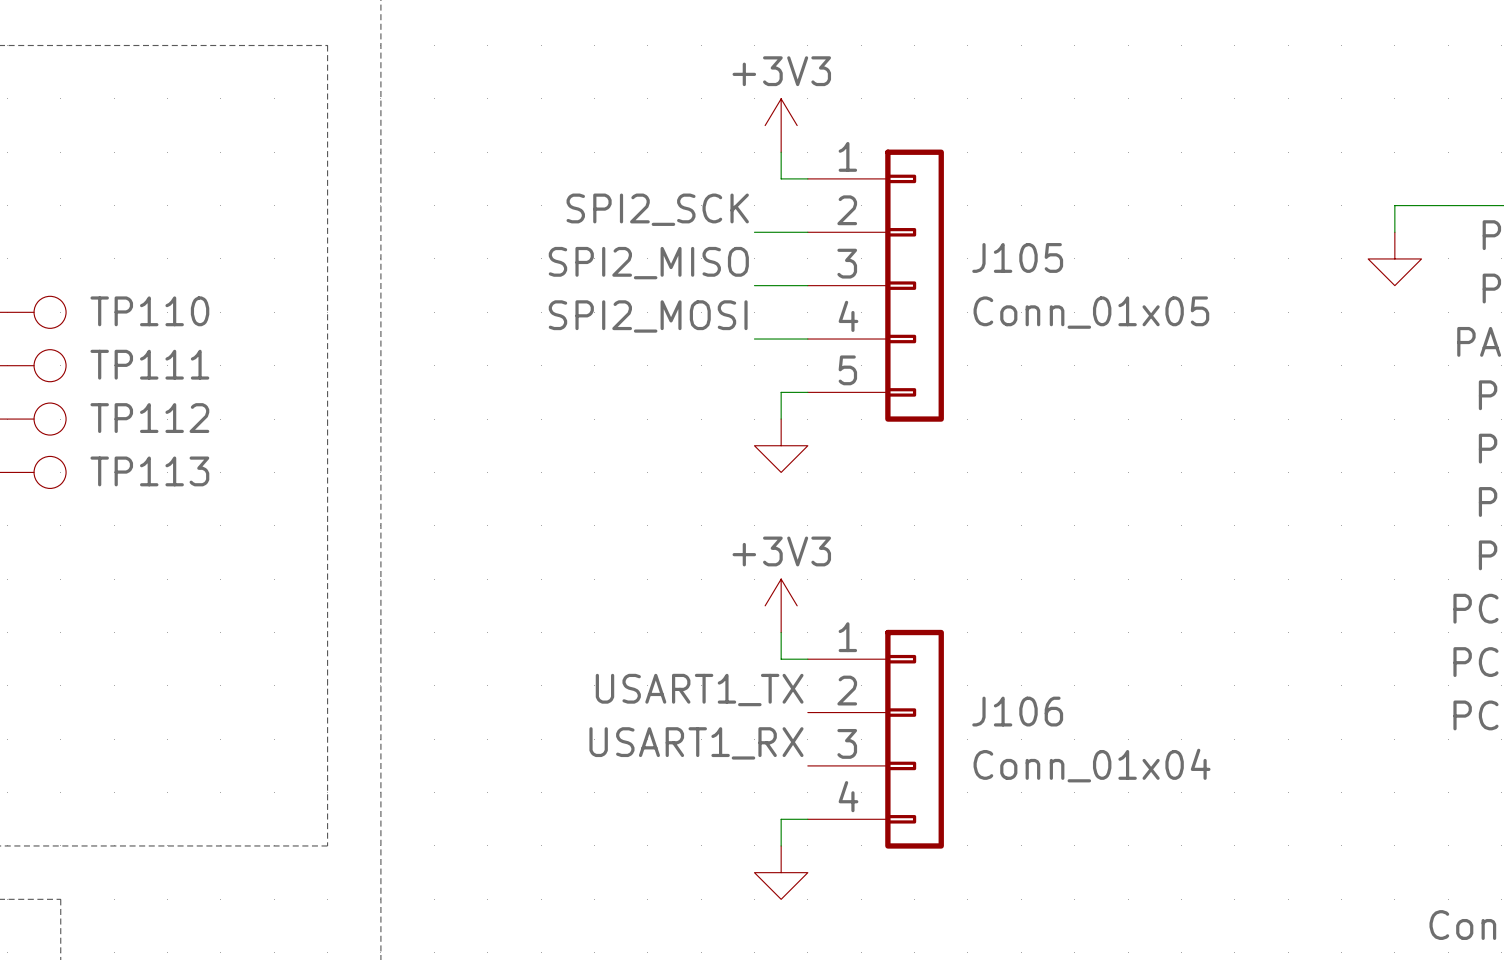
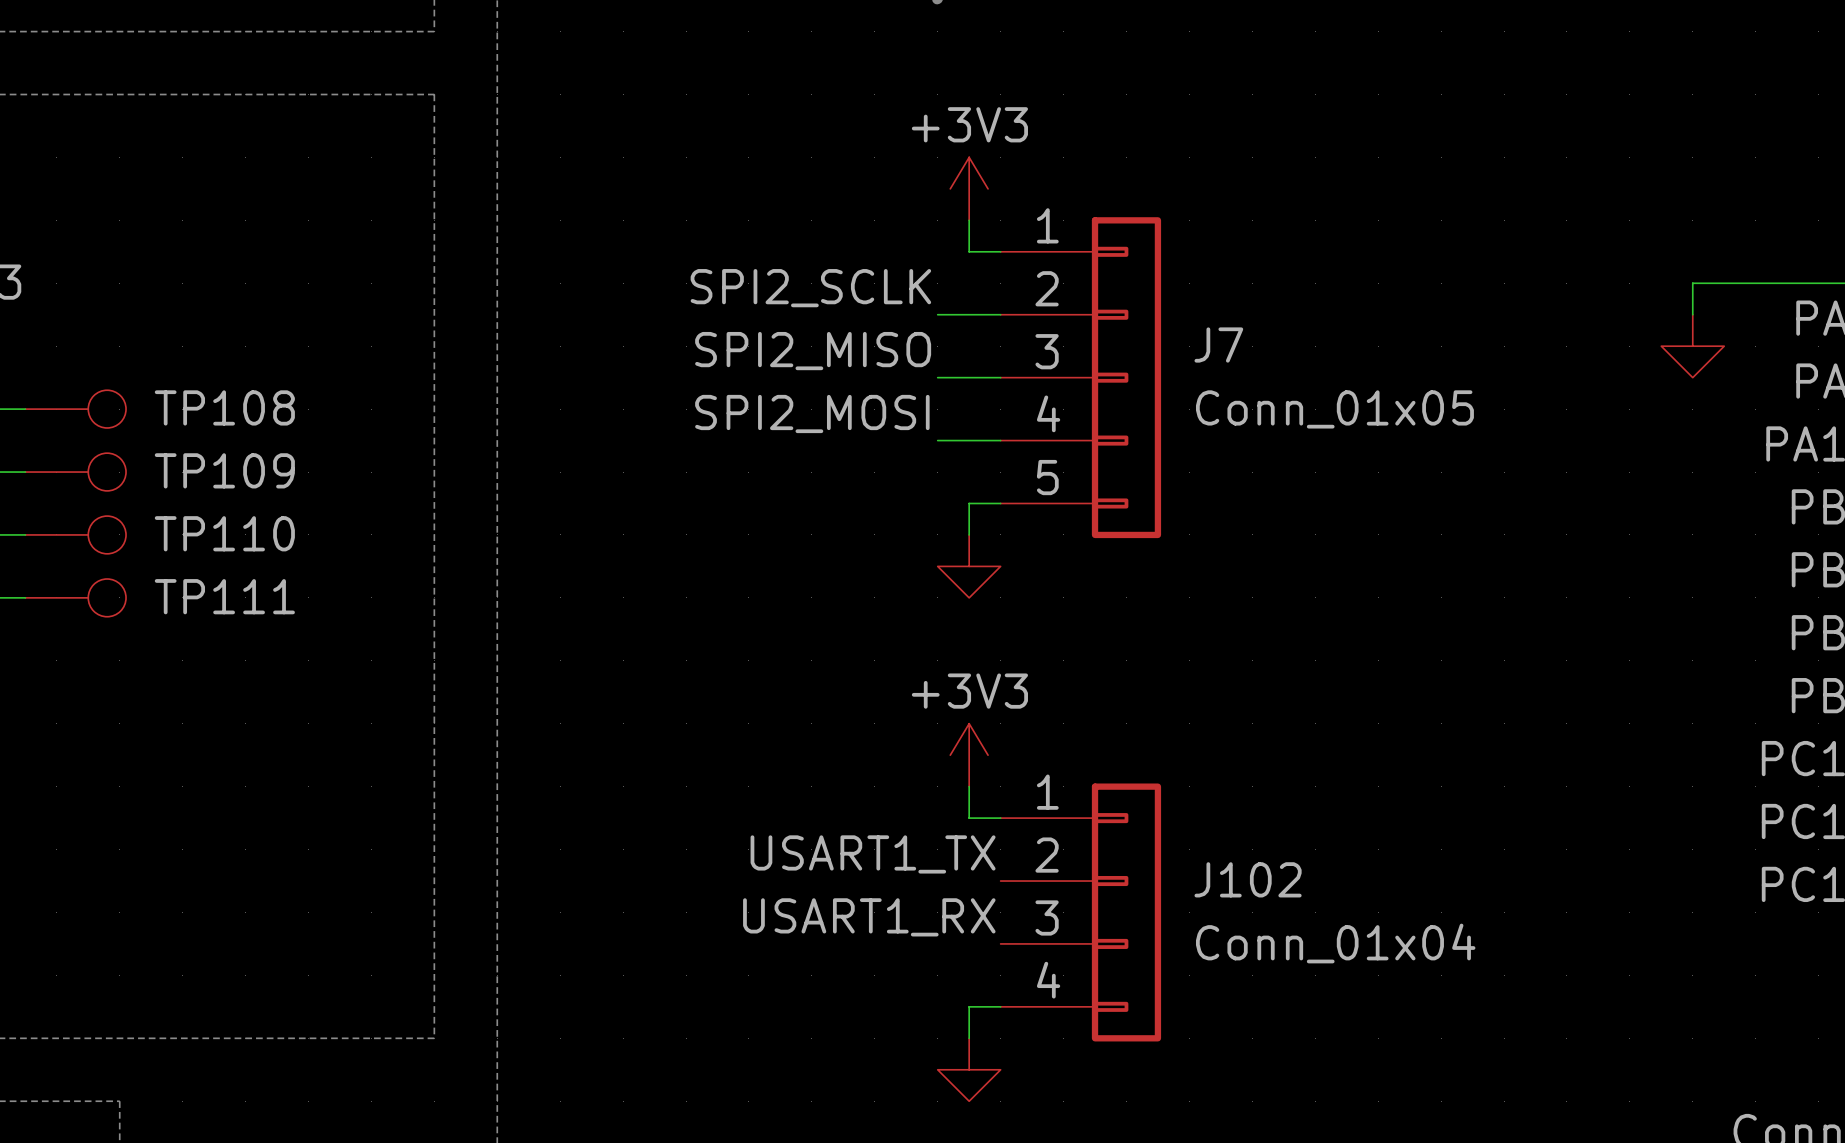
label: SPI2_SCK (657, 209) -> SPI2_SCLK (810, 288)
J105 name: J105 (1017, 257) -> J7 (1218, 345)
TP110 name: TP110 (149, 311) -> TP108 (224, 407)
TP111 name: TP111 (149, 364) -> TP109 (224, 470)
TP112 name: TP112 (149, 418) -> TP110 (224, 533)
TP113 name: TP113 (149, 471) -> TP111 (224, 596)
J106 name: J106 (1017, 711) -> J102 (1248, 879)

